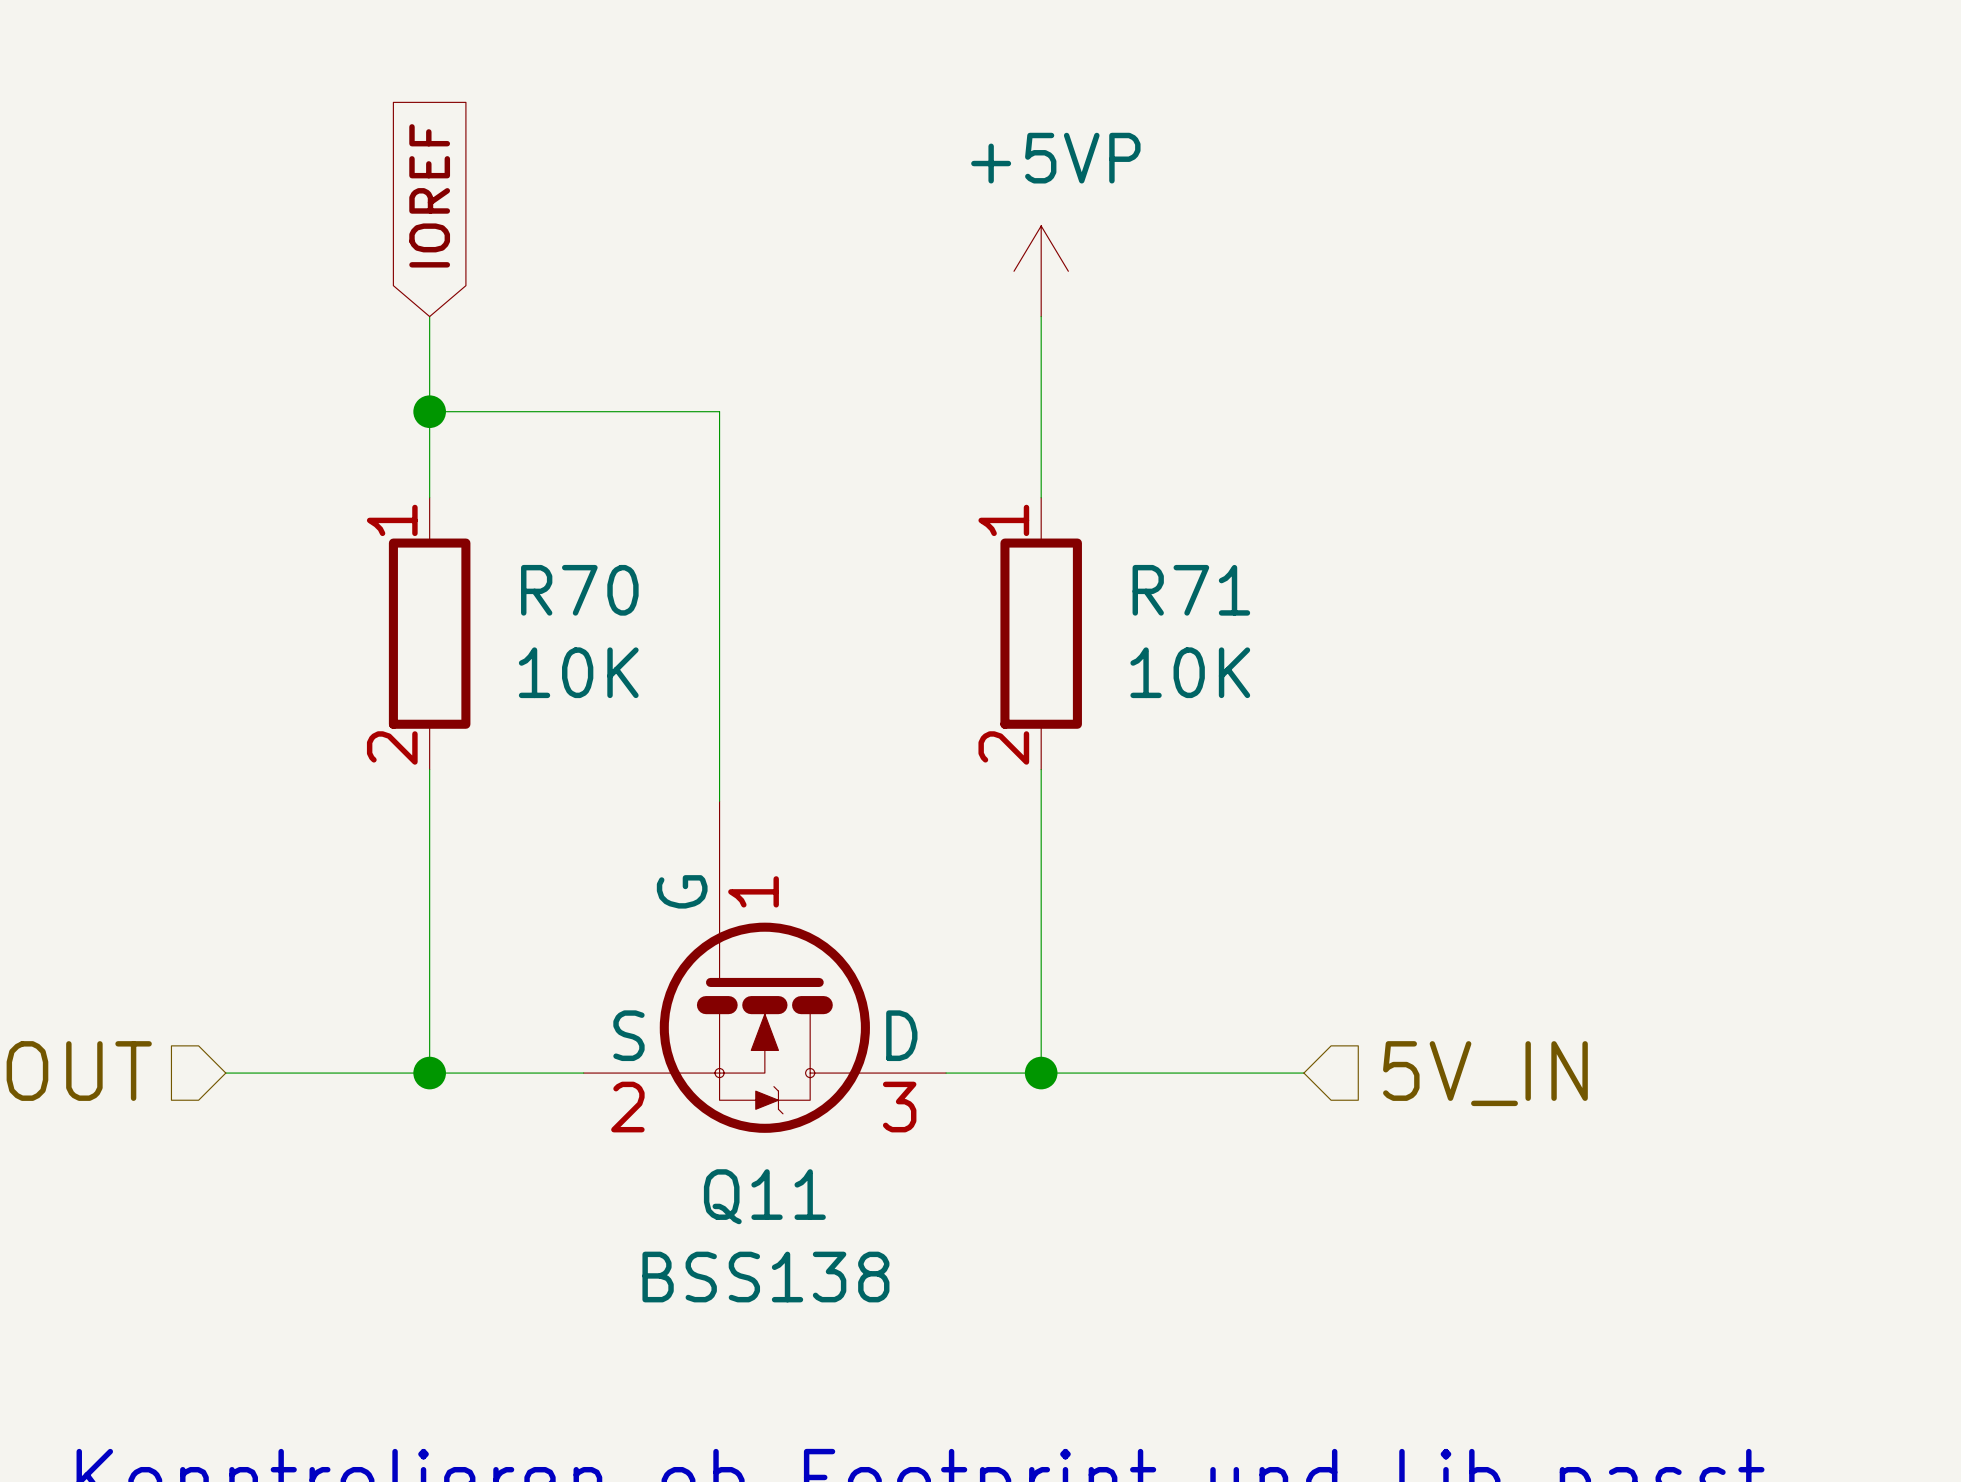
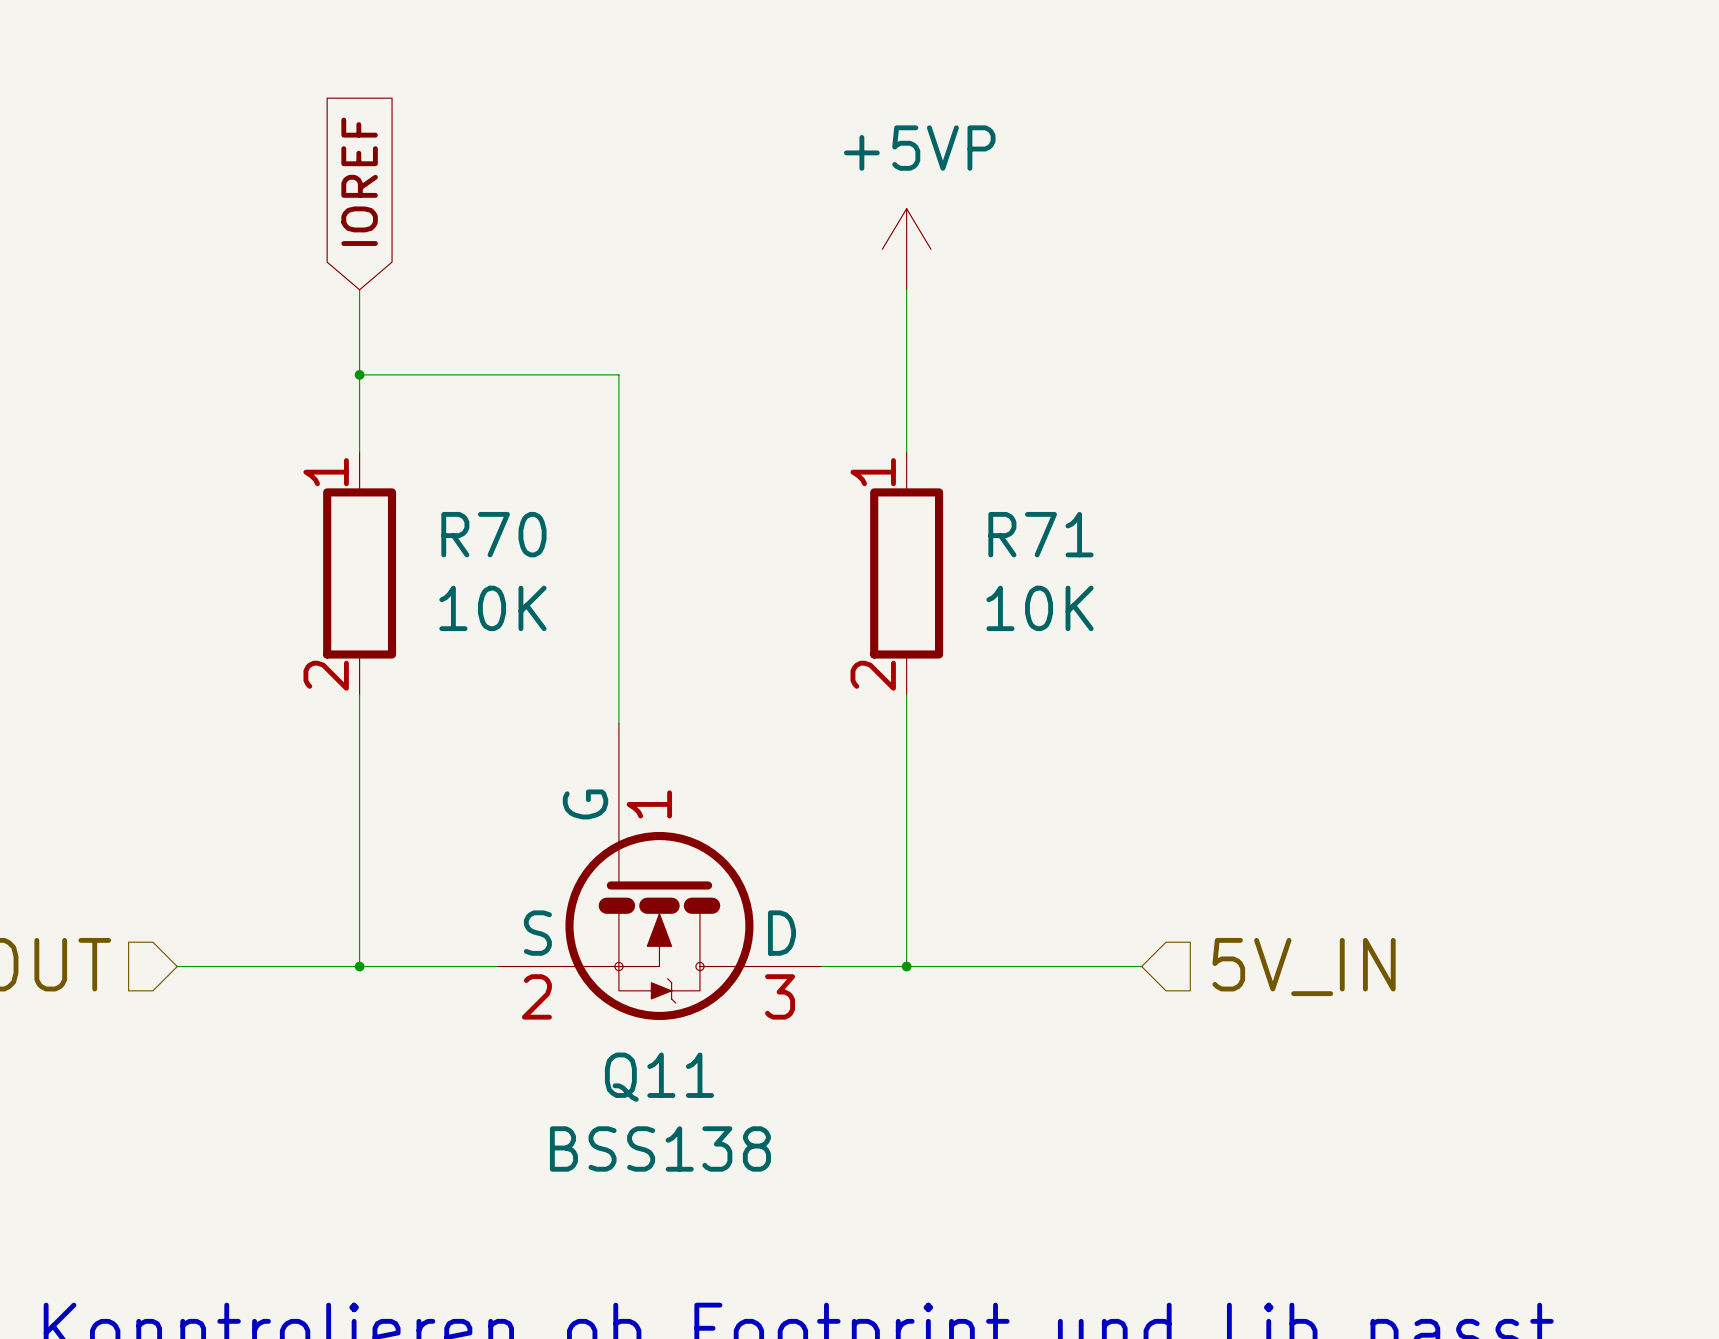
junction size: [413, 395, 446, 429] -> [354, 370, 365, 380]
junction size: [413, 1056, 446, 1090] -> [354, 961, 365, 972]
junction size: [1024, 1056, 1058, 1090] -> [901, 961, 912, 972]

